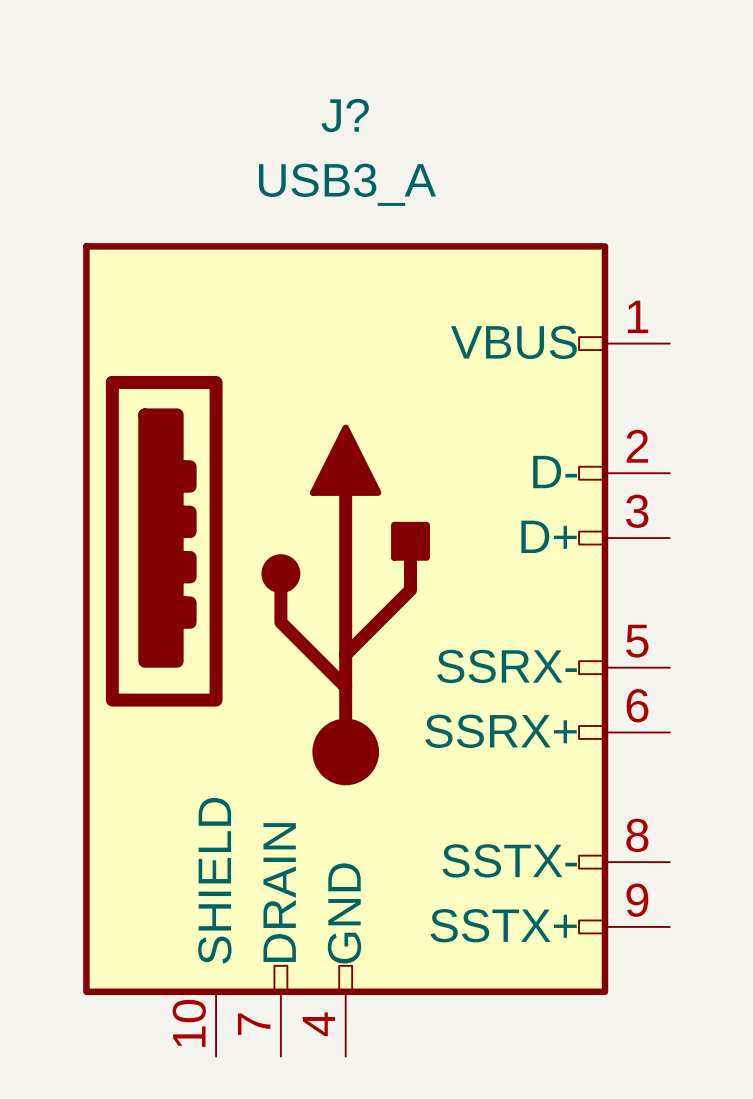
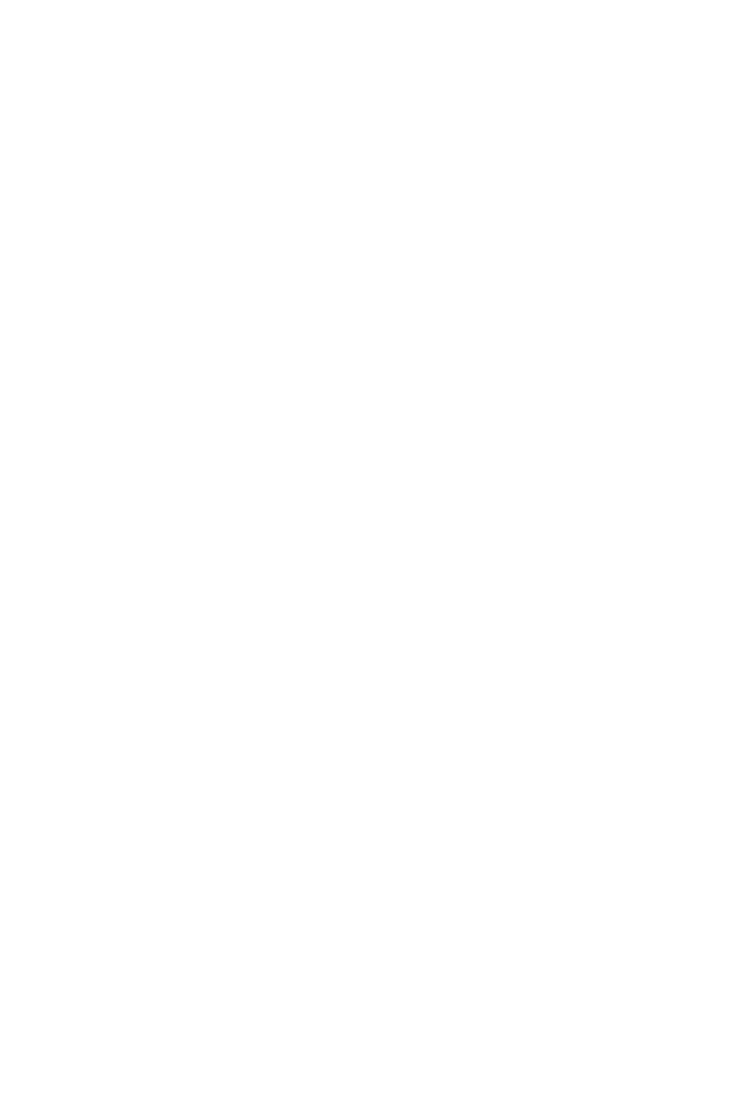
J?: USB3_A (376, 649) -> none

